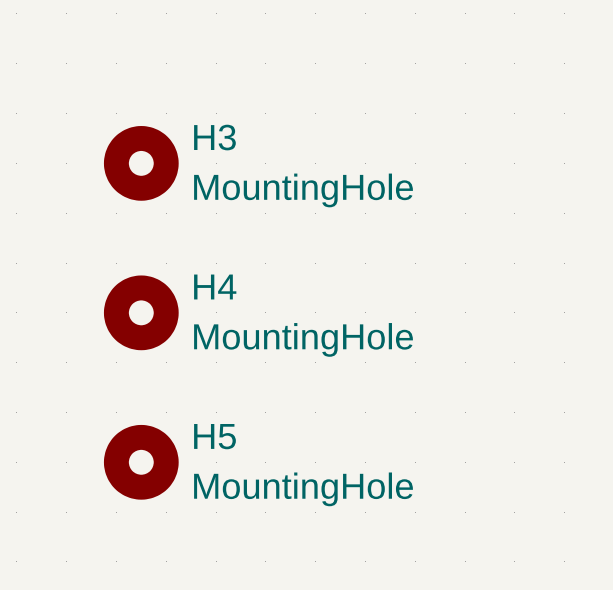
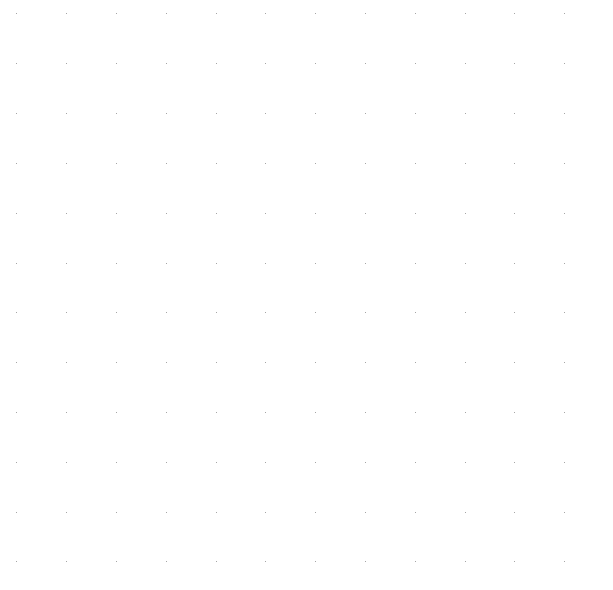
H3: MountingHole (141, 163) -> none
H4: MountingHole (141, 312) -> none
H5: MountingHole (141, 462) -> none

